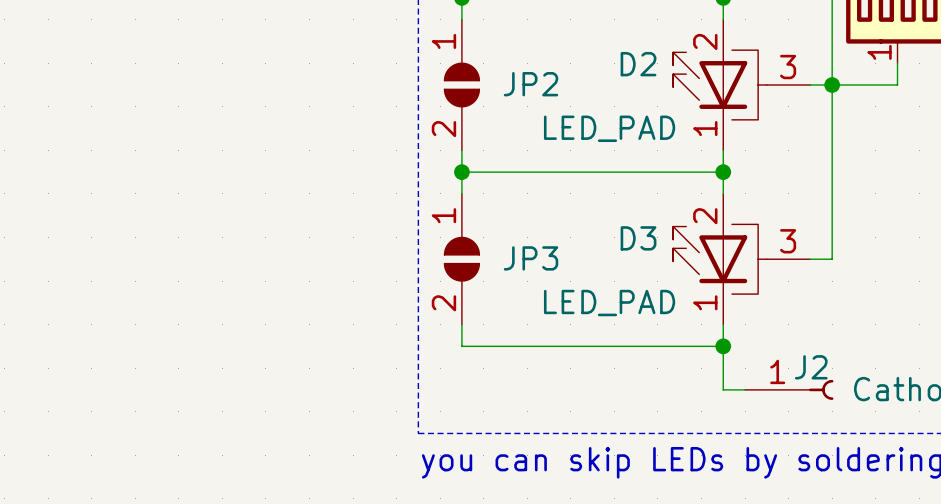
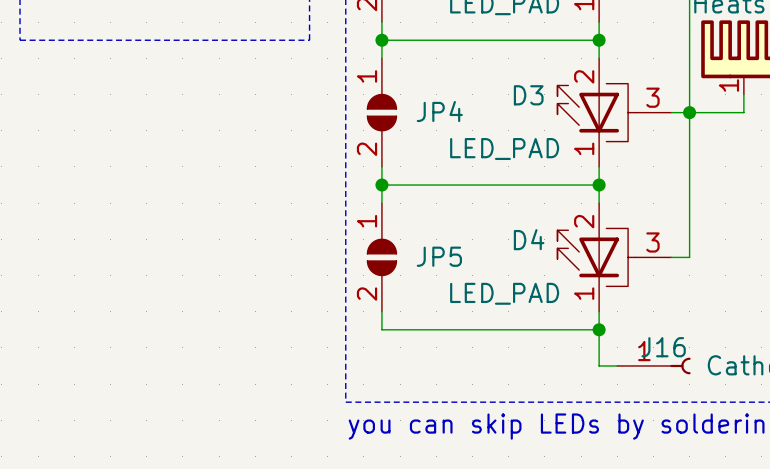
D2 name: D2 (638, 64) -> D3 (528, 95)
JP2 name: JP2 (531, 84) -> JP4 (439, 111)
D3 name: D3 (638, 238) -> D4 (529, 239)
JP3 name: JP3 (531, 258) -> JP5 (439, 256)
J2 name: J2 (811, 367) -> J16 (663, 347)

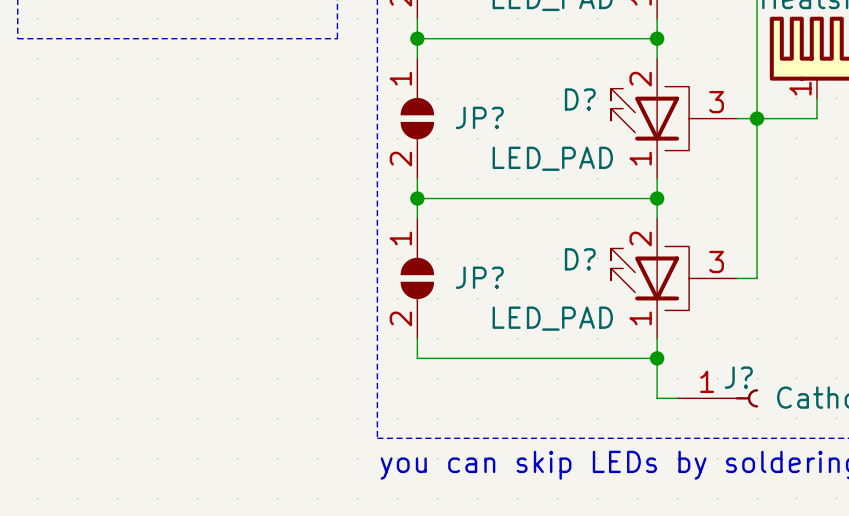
D3 name: D3 (528, 95) -> D? (580, 99)
JP4 name: JP4 (439, 111) -> JP? (479, 117)
D4 name: D4 (529, 239) -> D? (580, 259)
JP5 name: JP5 (439, 256) -> JP? (479, 277)
J16 name: J16 (663, 347) -> J? (738, 377)

